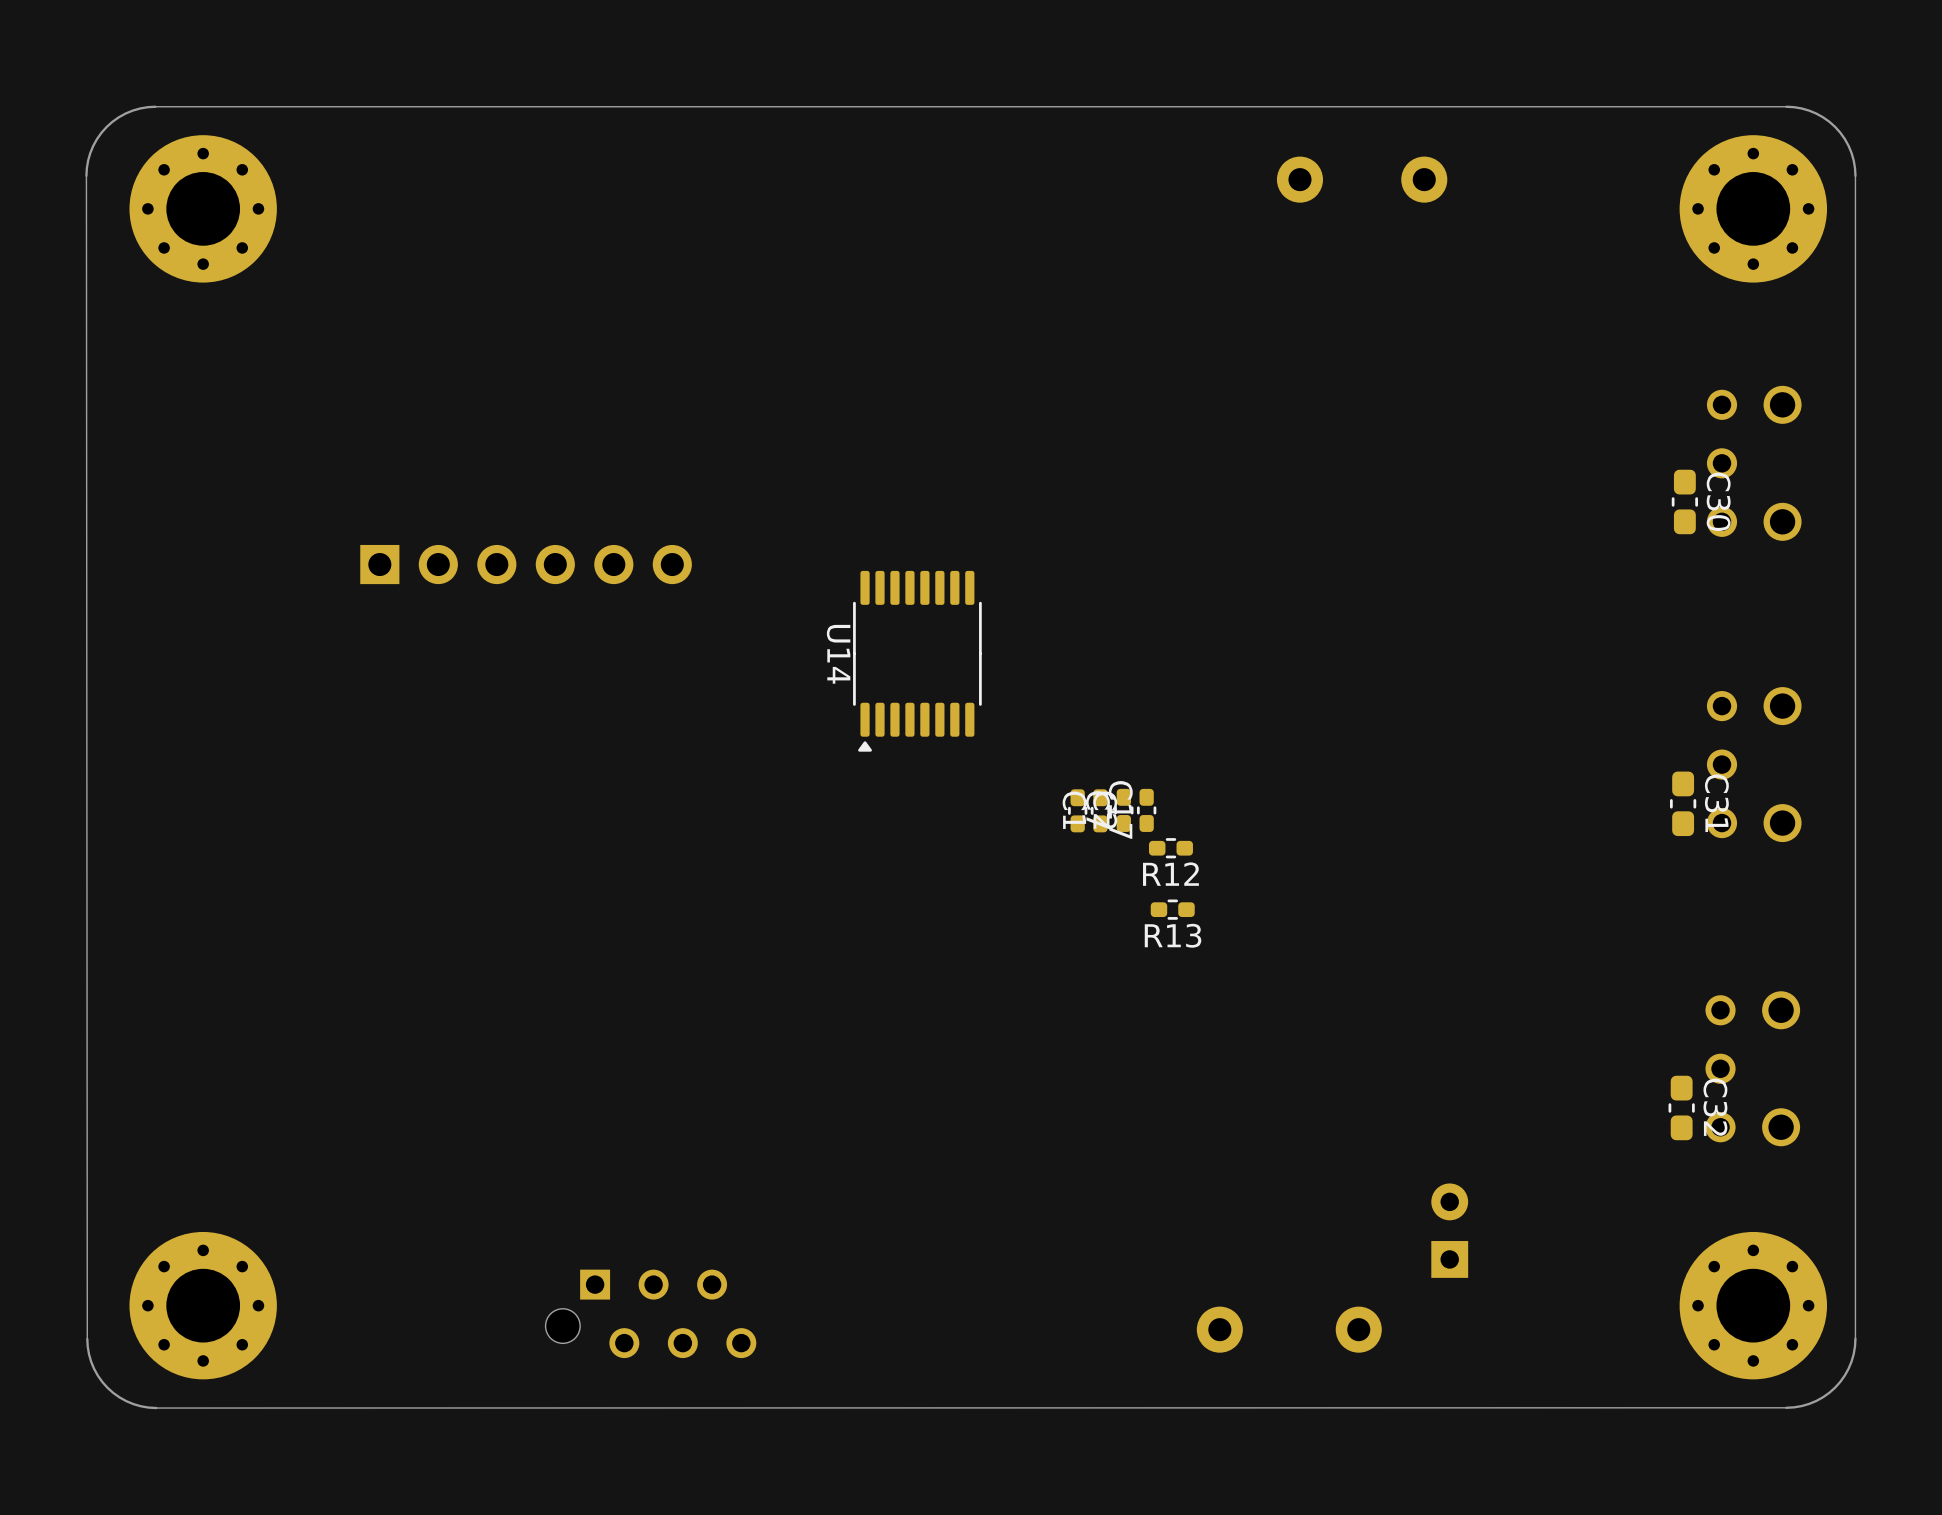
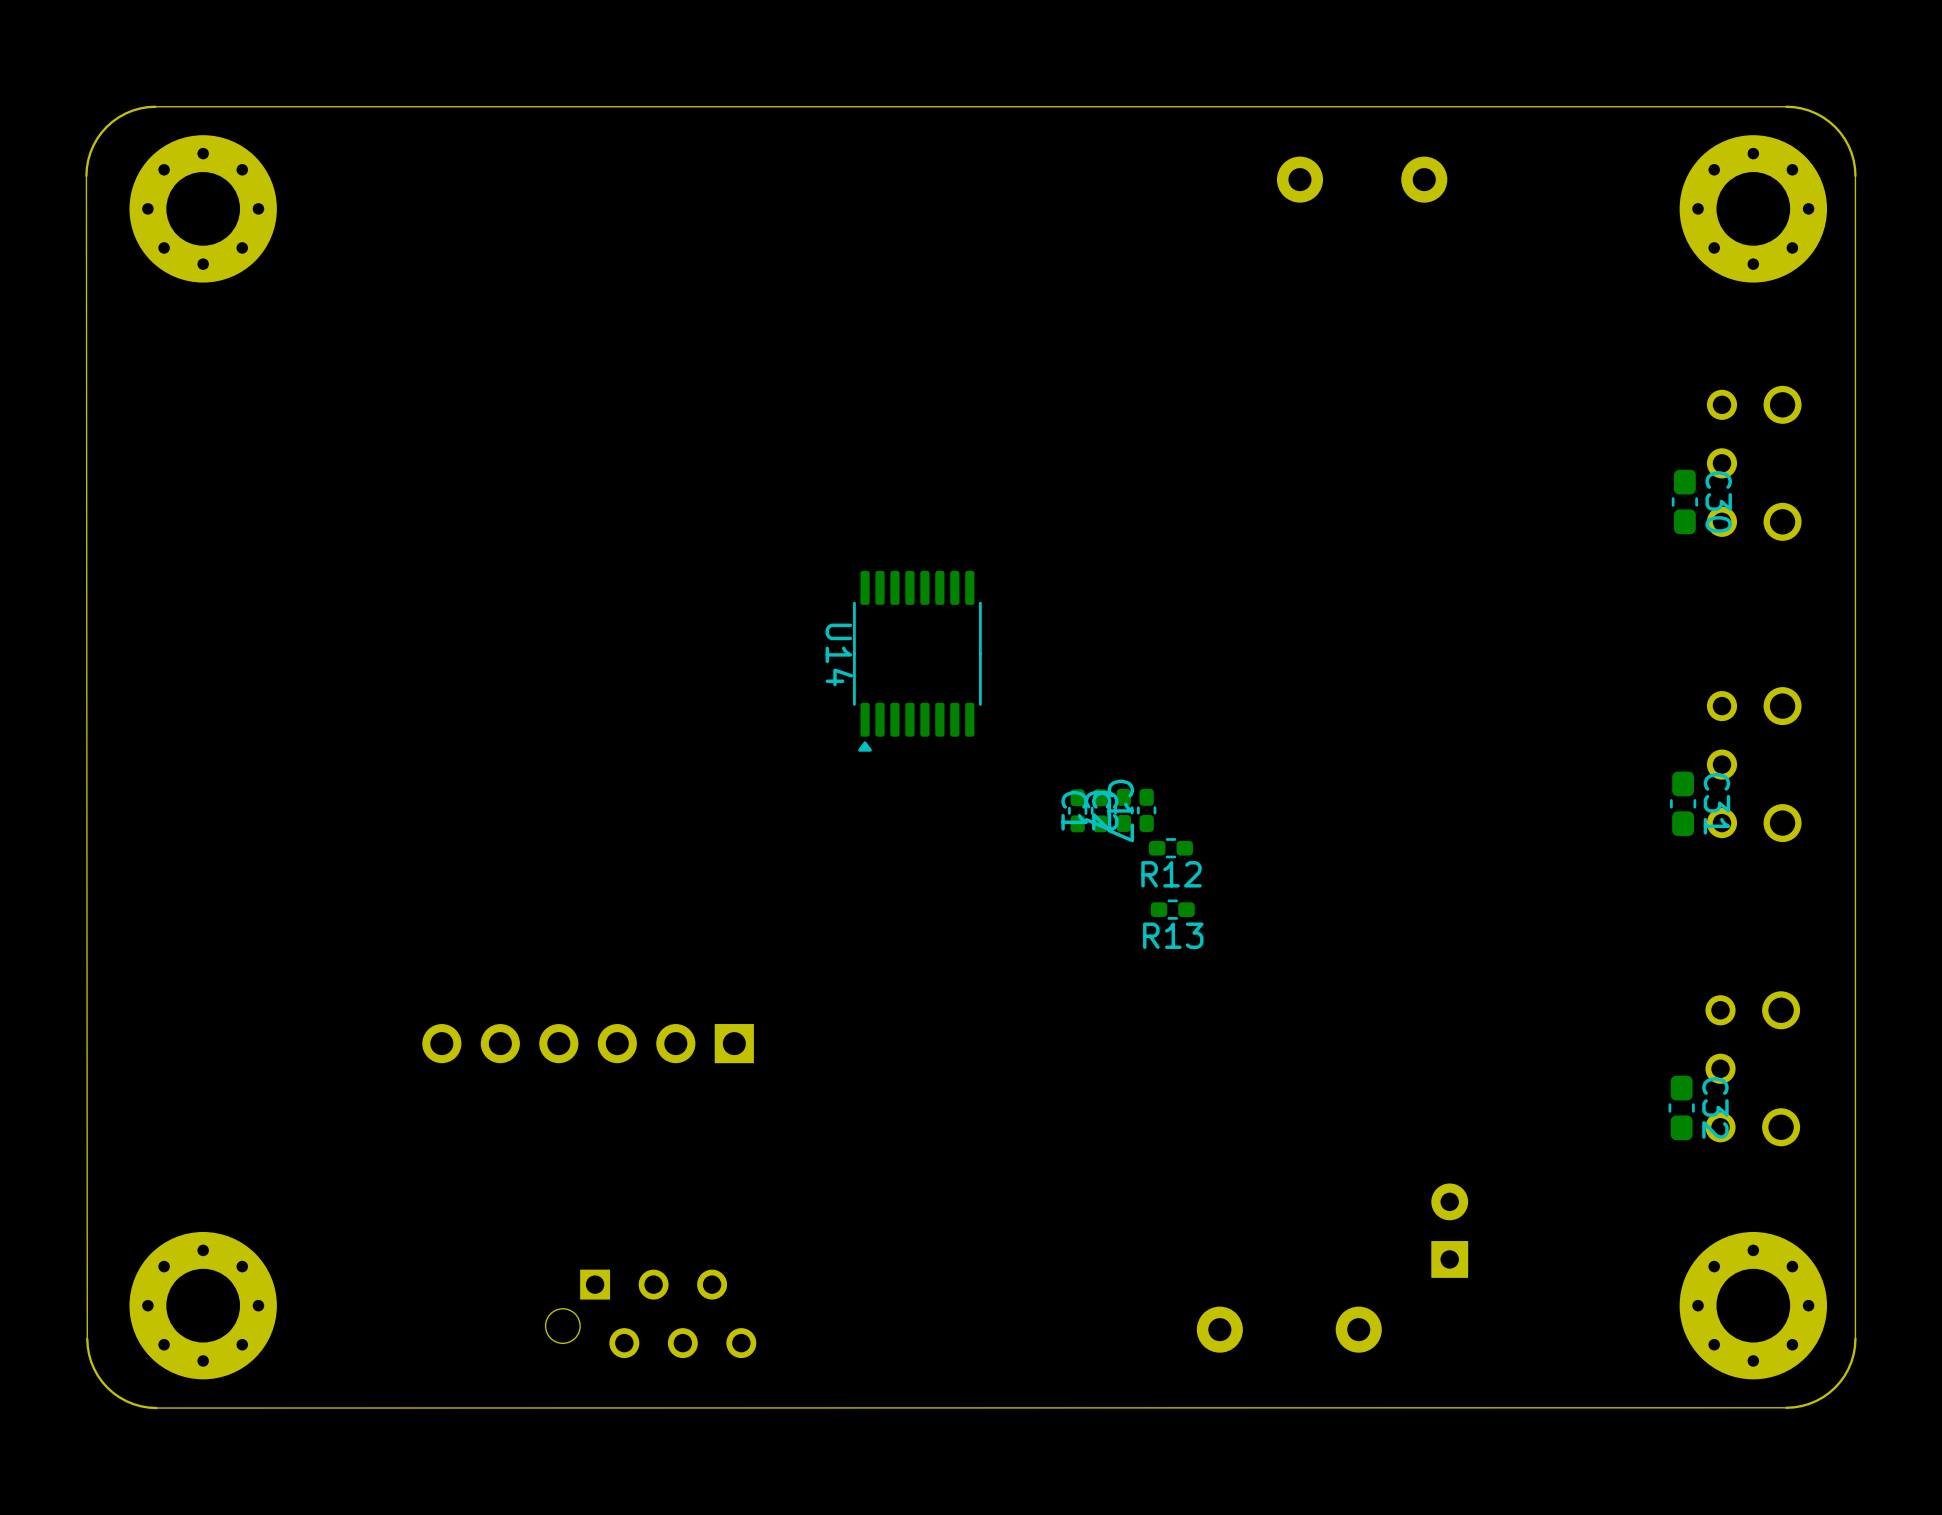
part rotation: 0° (526, 564) -> 180° (588, 1043)
part position: (526, 564) -> (588, 1043)

